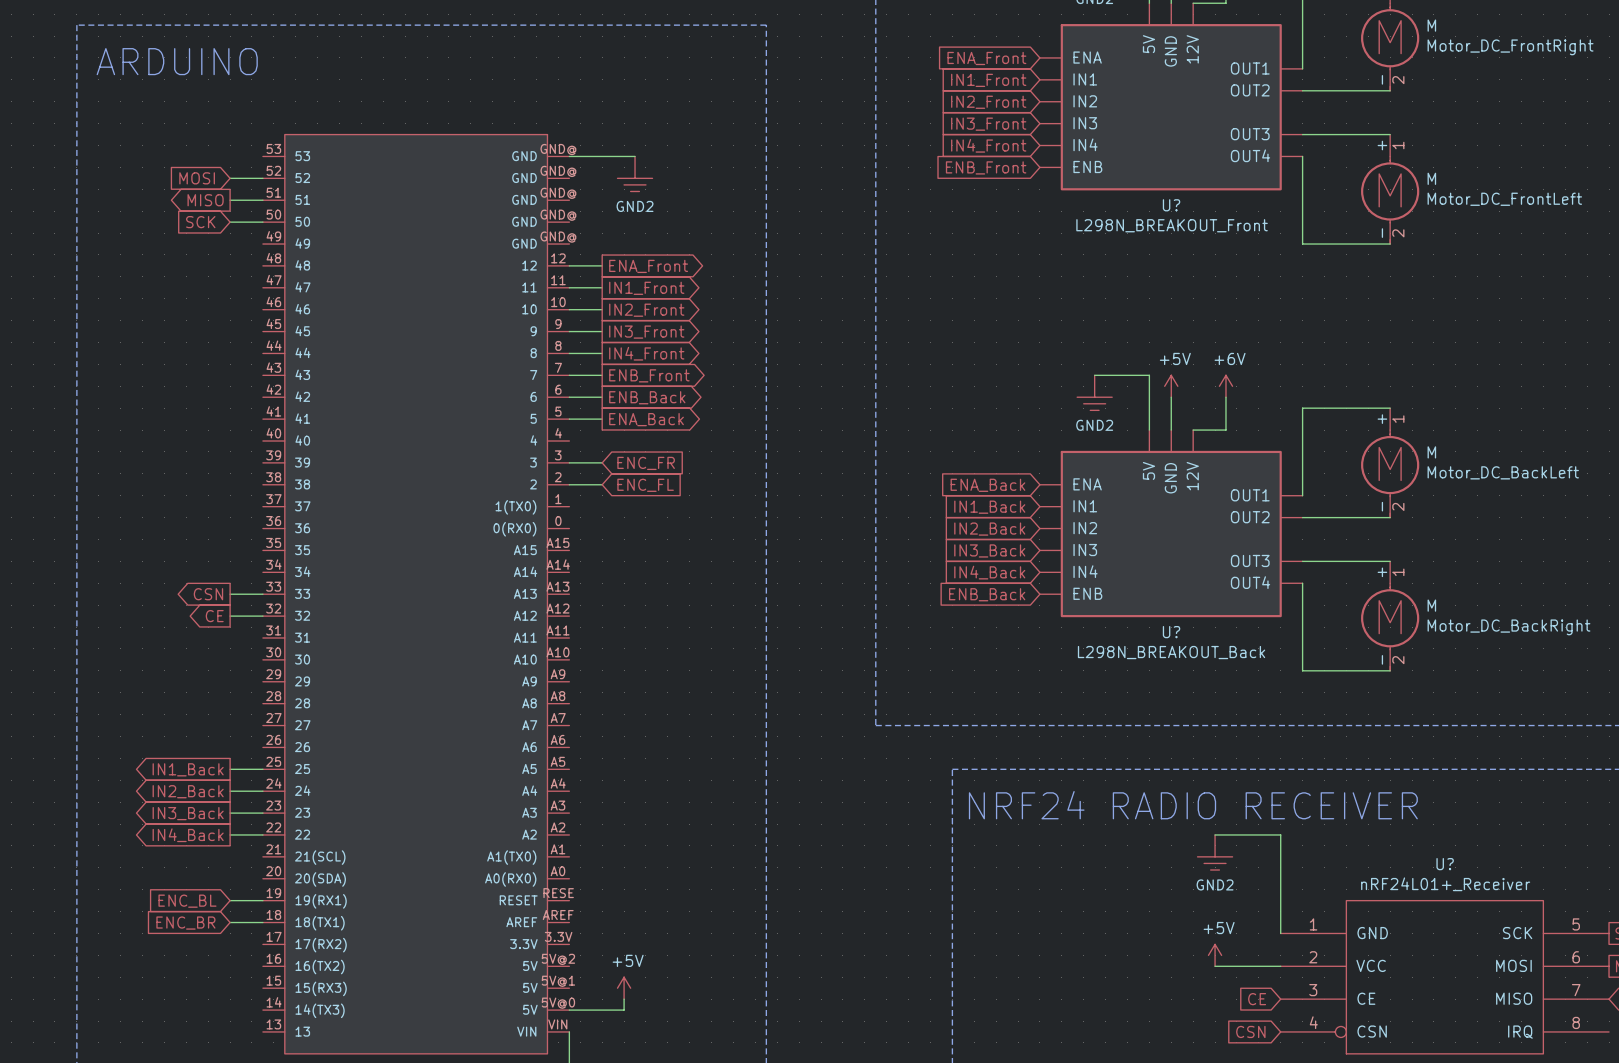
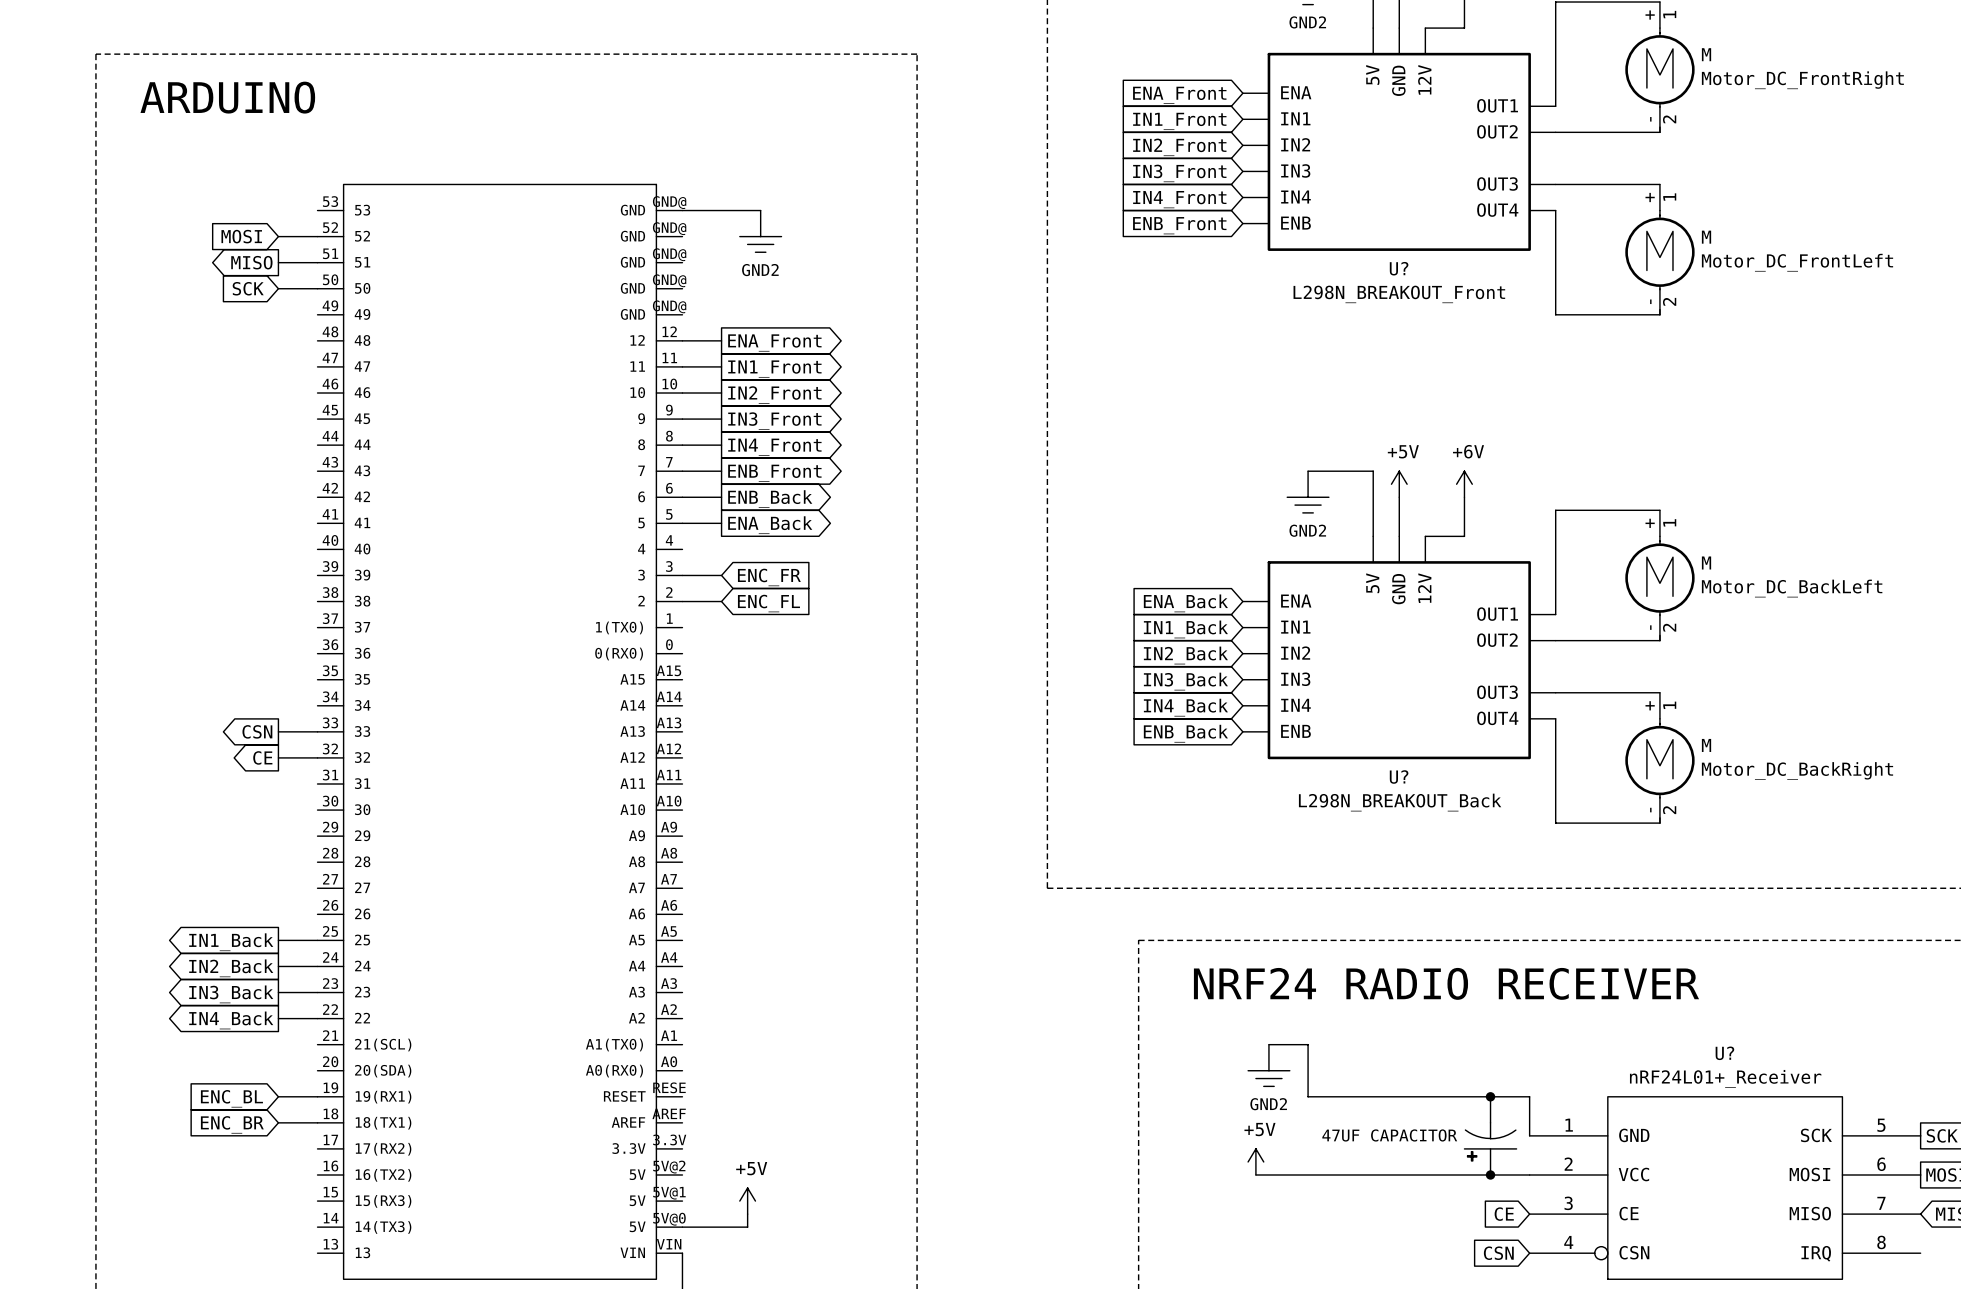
wire: (1215, 834) (1280, 834) (1280, 900) -> (1268, 1044) (1308, 1044) (1308, 1096) (1529, 1096)
power symbol position: GND2 (1215, 852) -> GND2 (1268, 1065)
junction: none -> (1490, 1096)
part: none -> 47UF CAPACITOR (1490, 1135)
power symbol position: +5V (1215, 955) -> +5V (1255, 1161)
wire: none -> (1255, 1174) (1451, 1174)
junction: none -> (1490, 1174)

